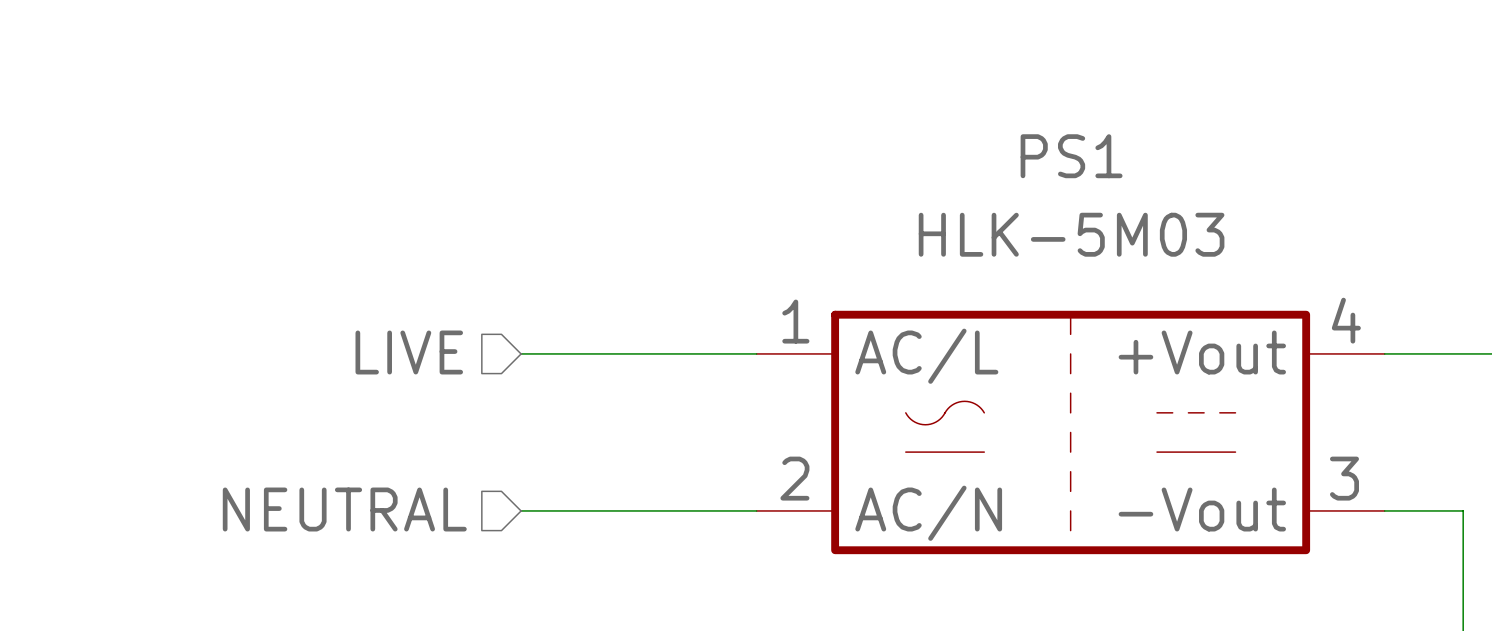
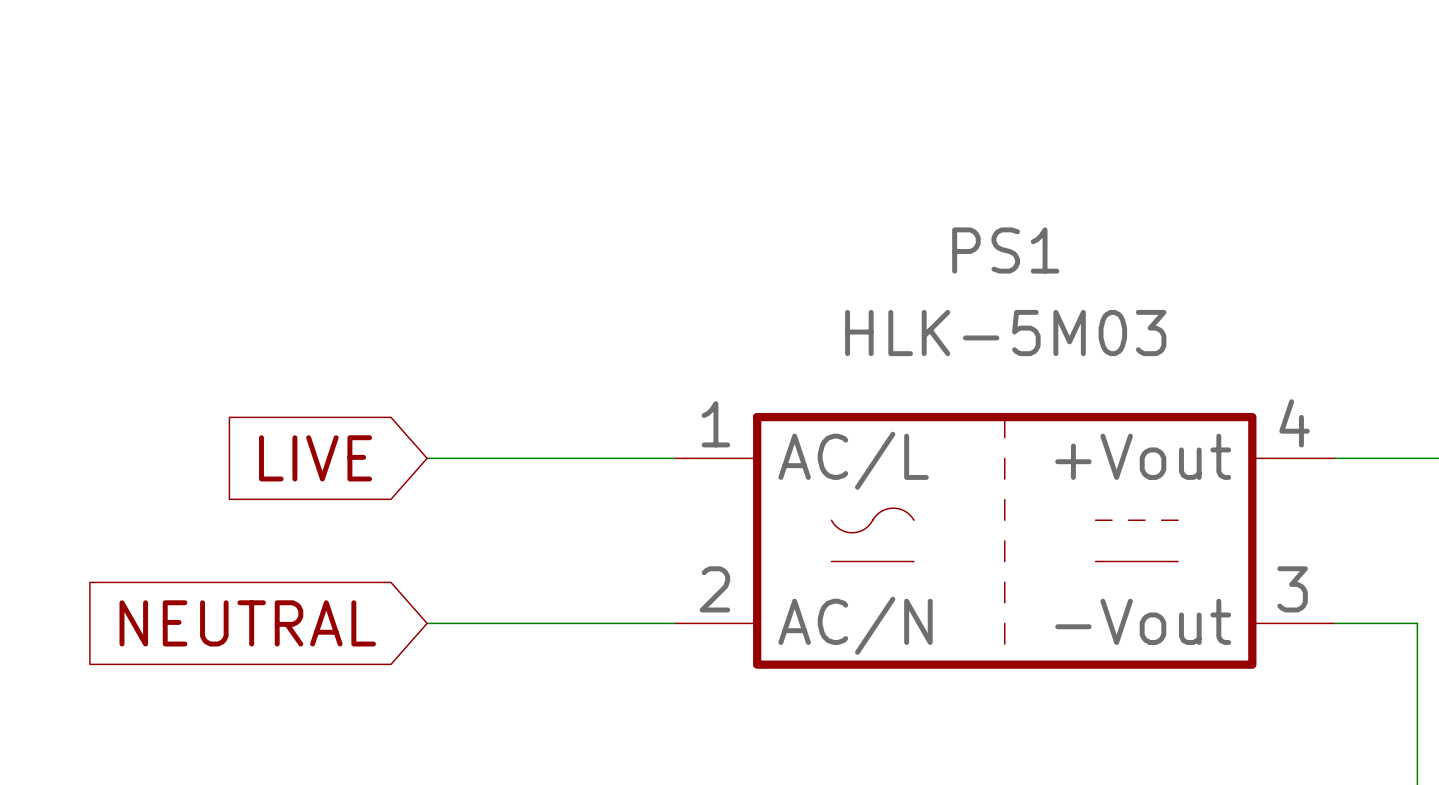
hierarchical label: LIVE (409, 352) -> none
global label: none -> LIVE (315, 458)
hierarchical label: NEUTRAL (344, 509) -> none
global label: none -> NEUTRAL (247, 623)

